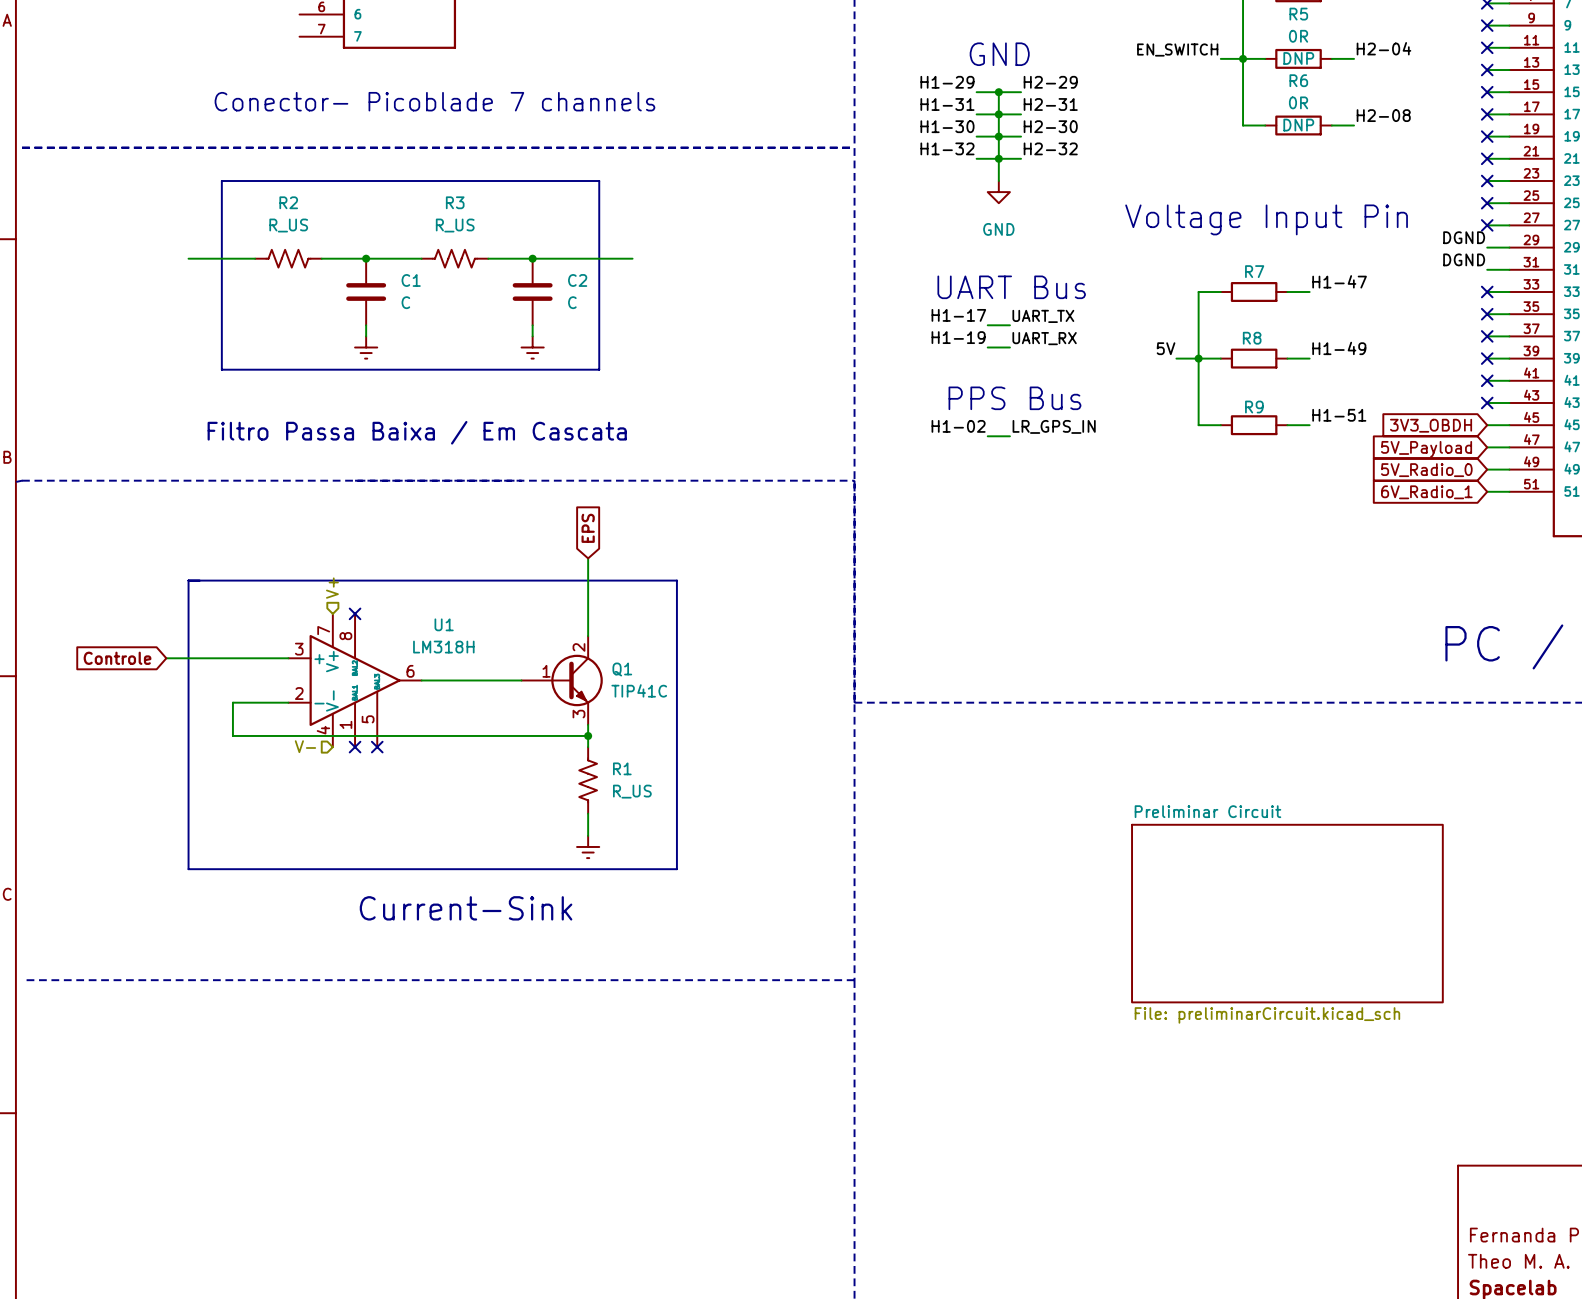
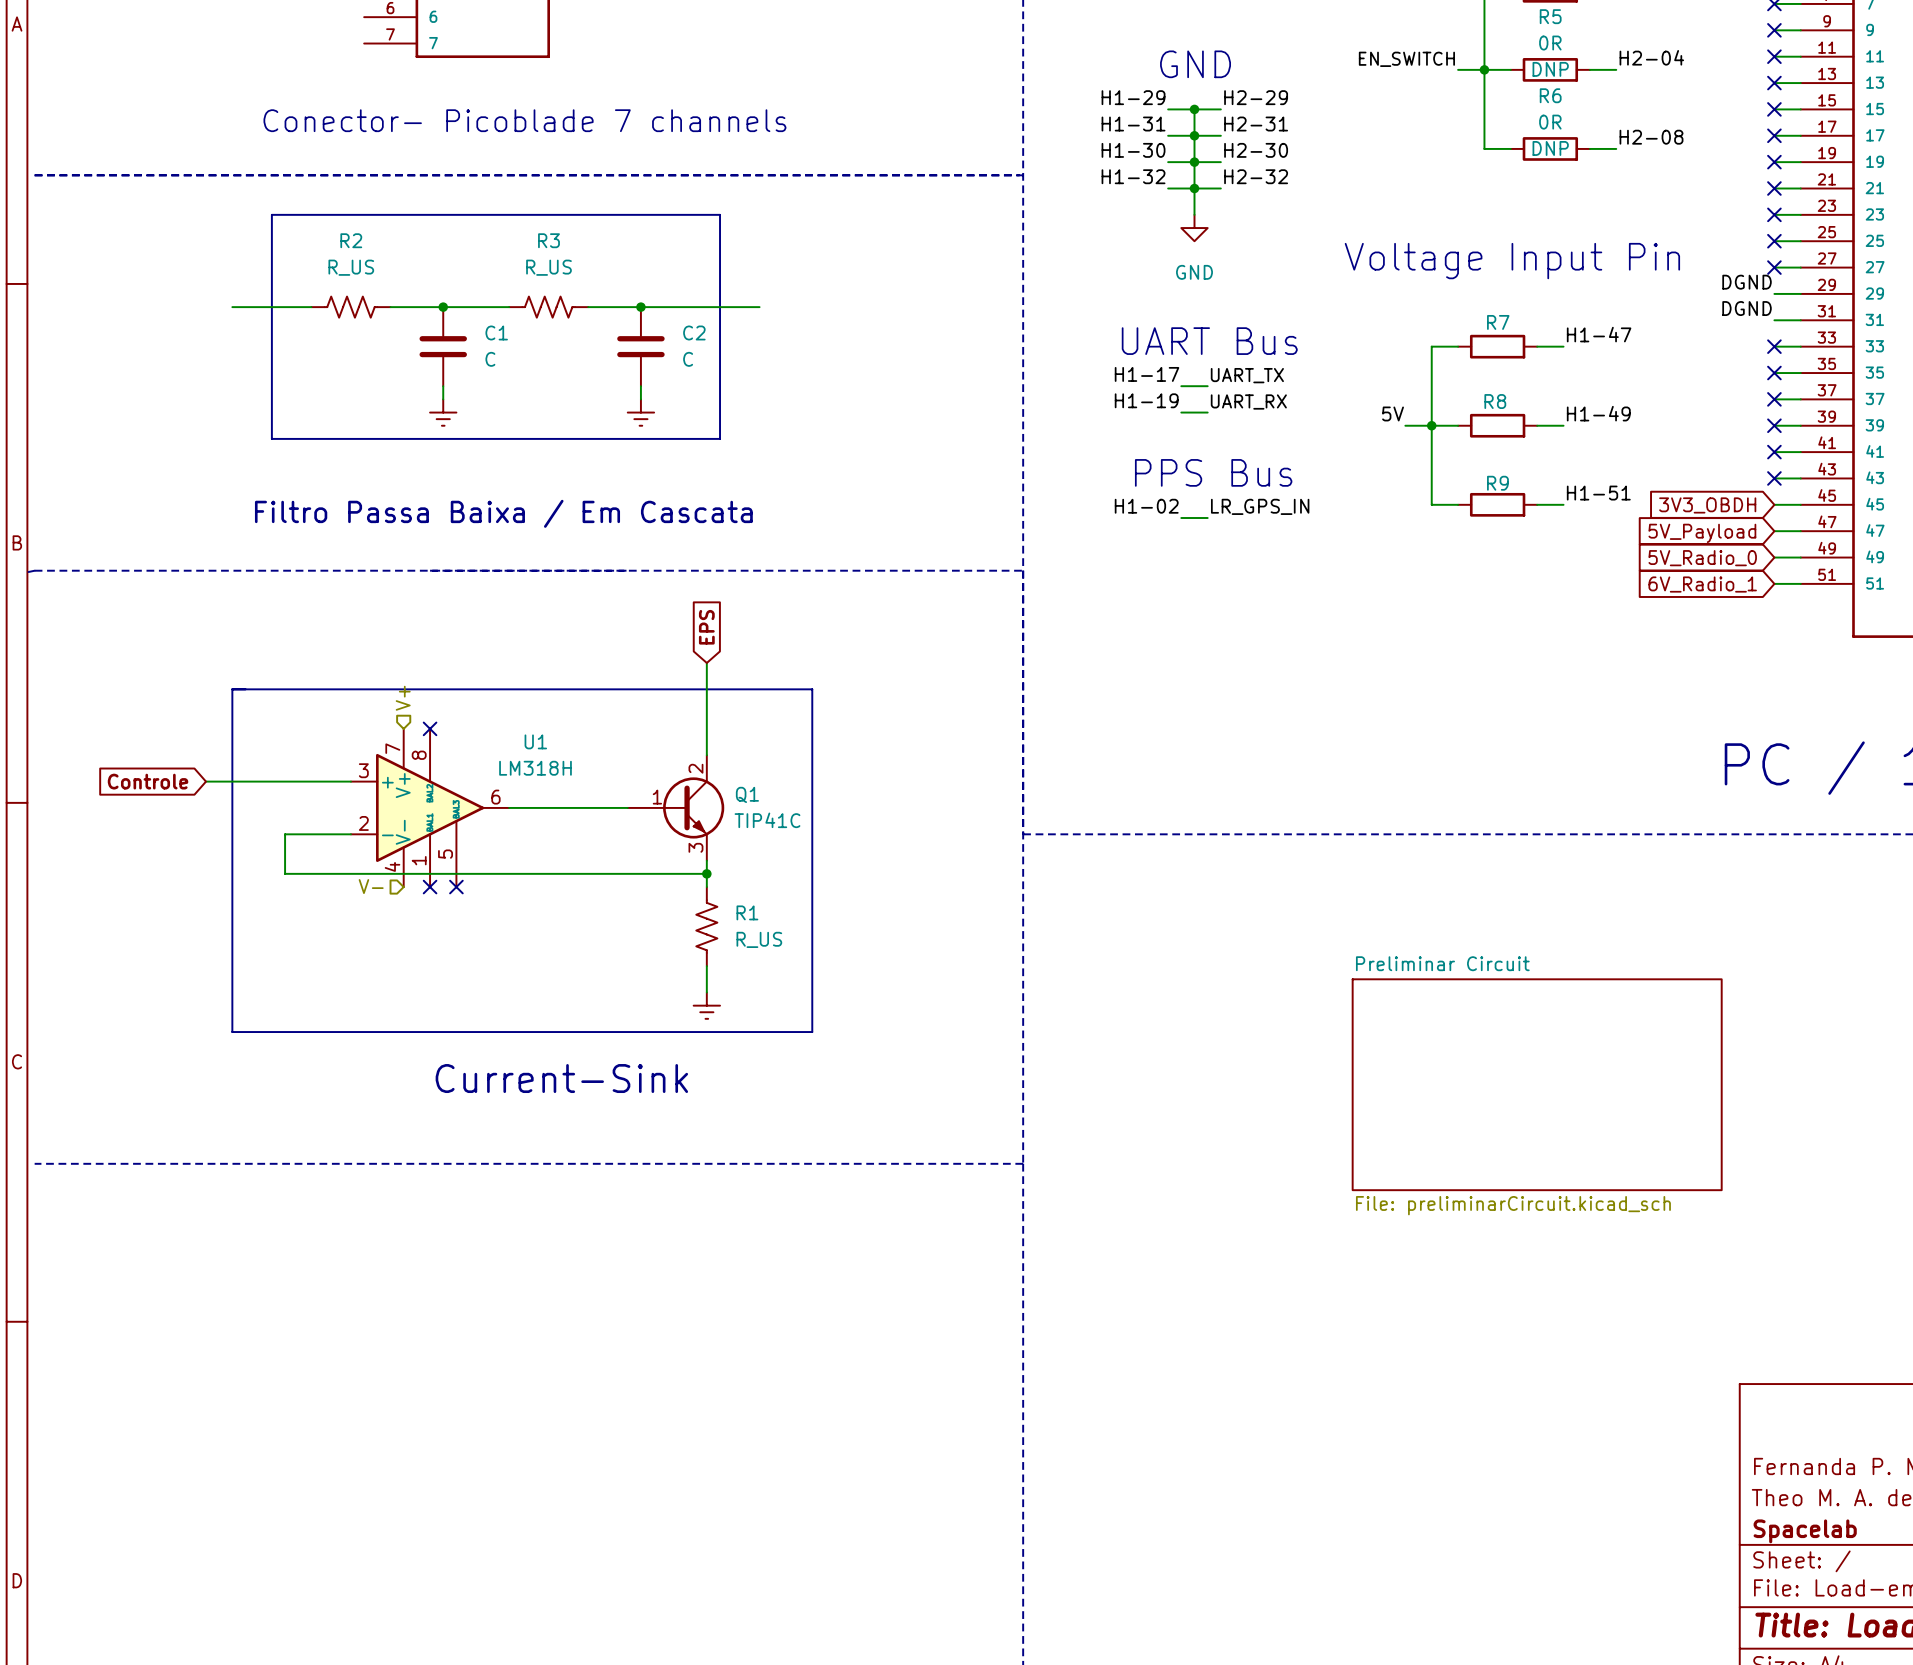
U1 symbol: [288, 613, 422, 748] -> [350, 728, 510, 888]

